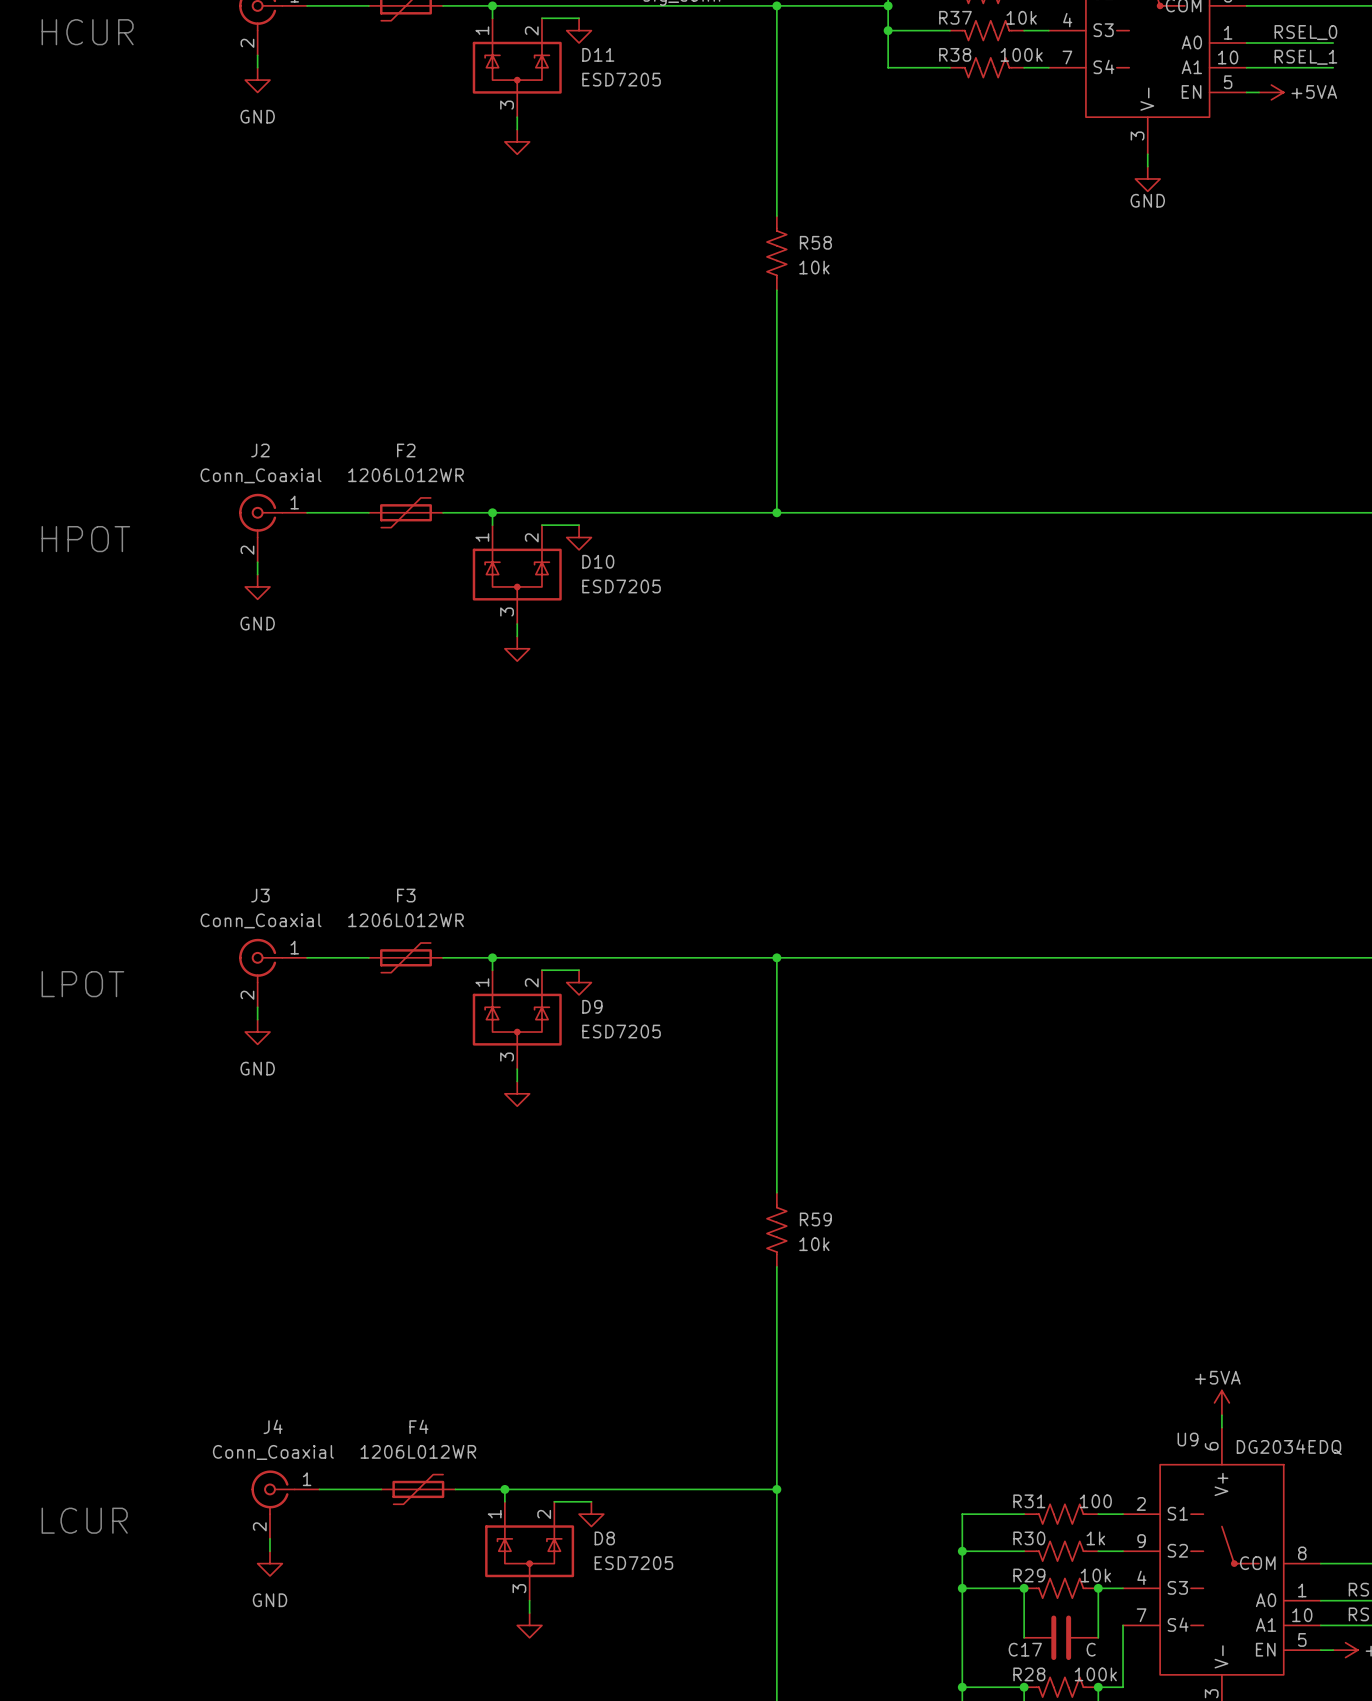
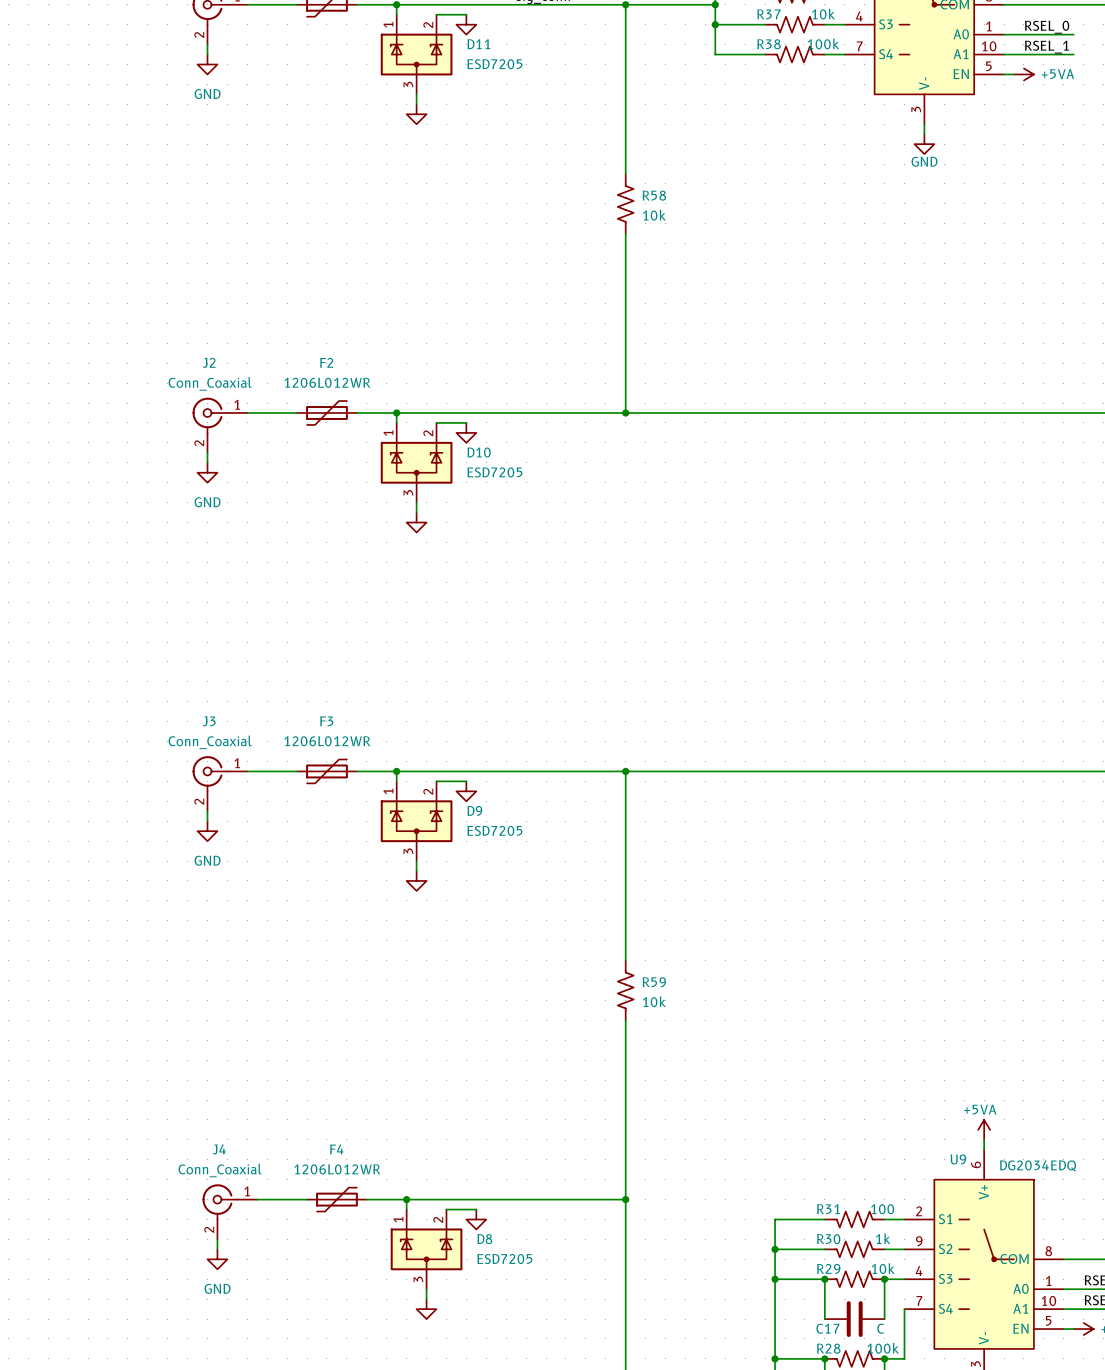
text: HCUR (87, 32) -> none
text: HPOT (85, 539) -> none
text: LPOT (82, 984) -> none
text: LCUR (84, 1520) -> none

